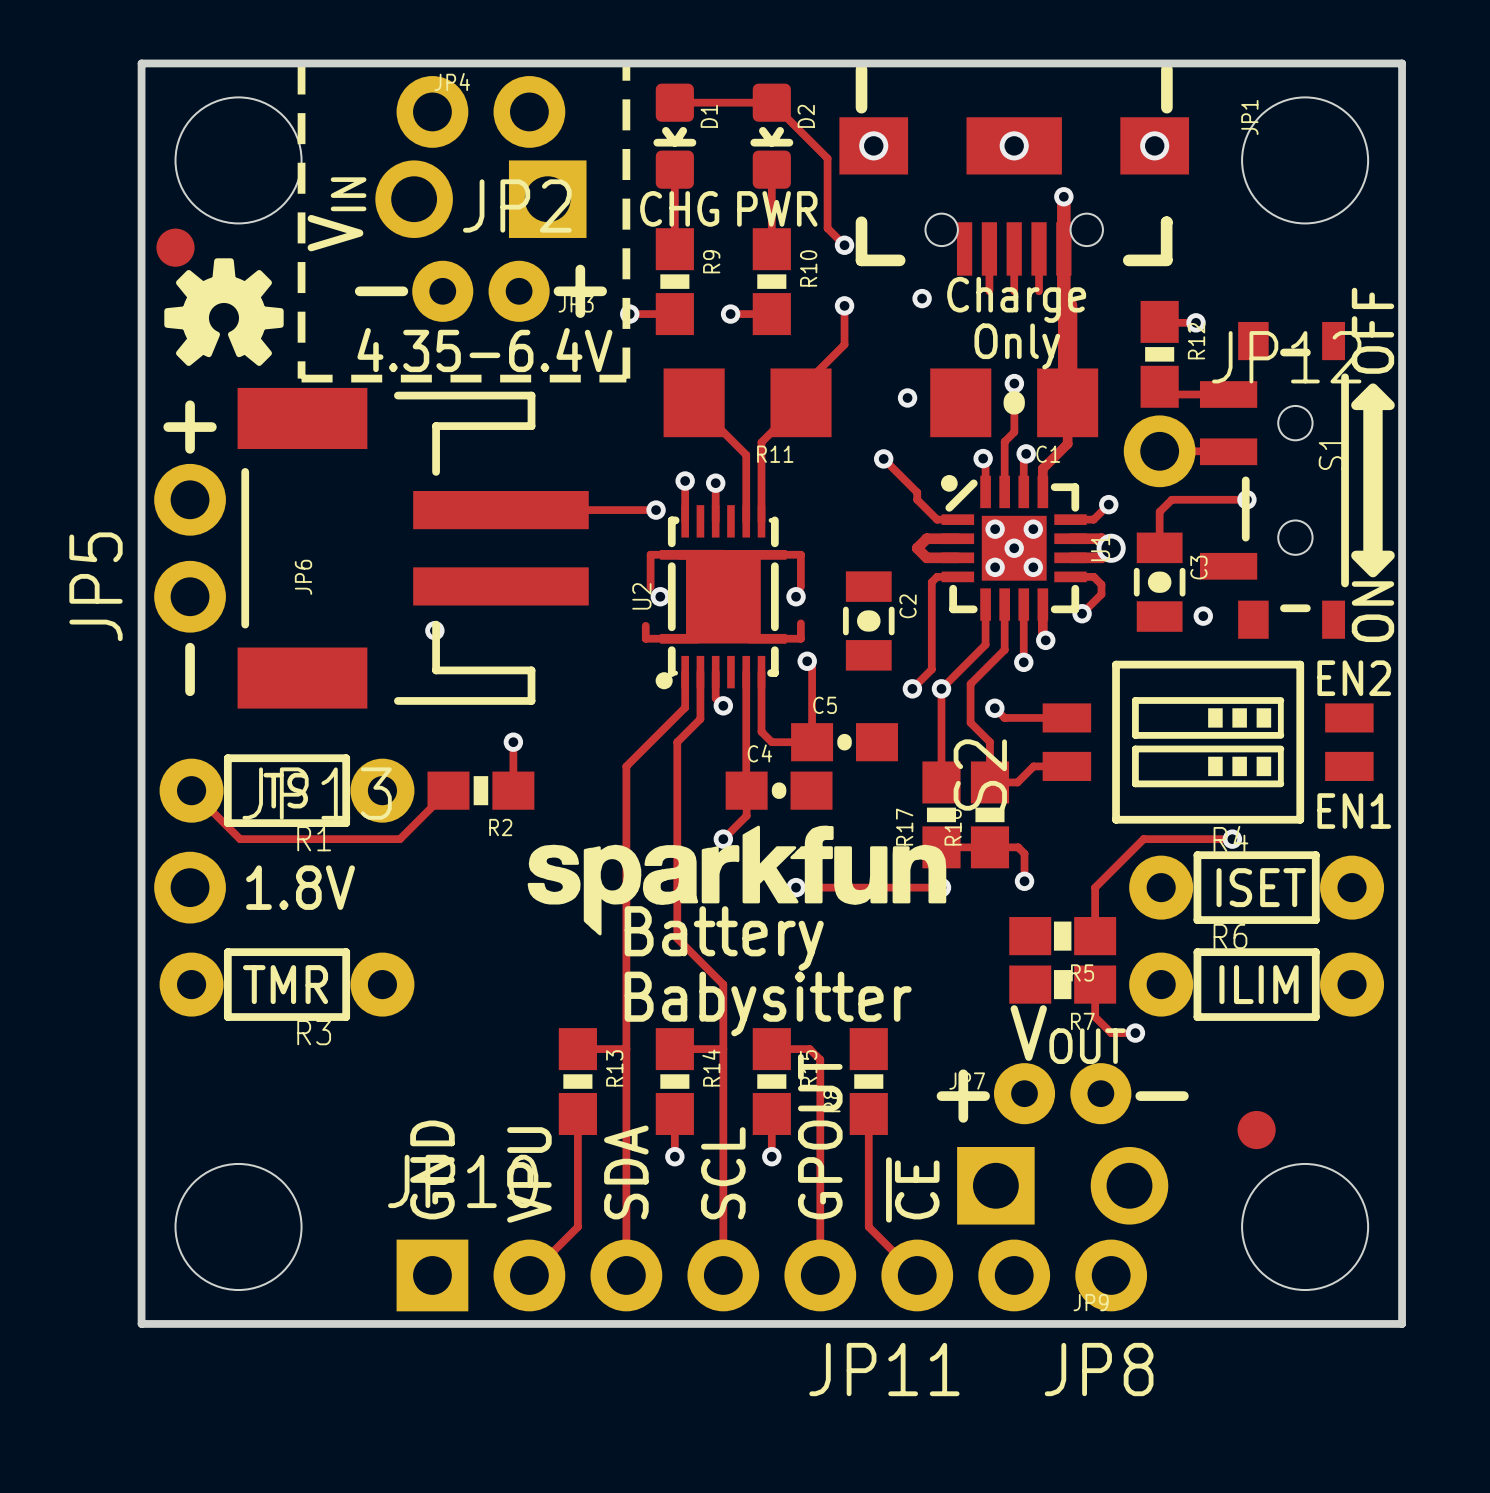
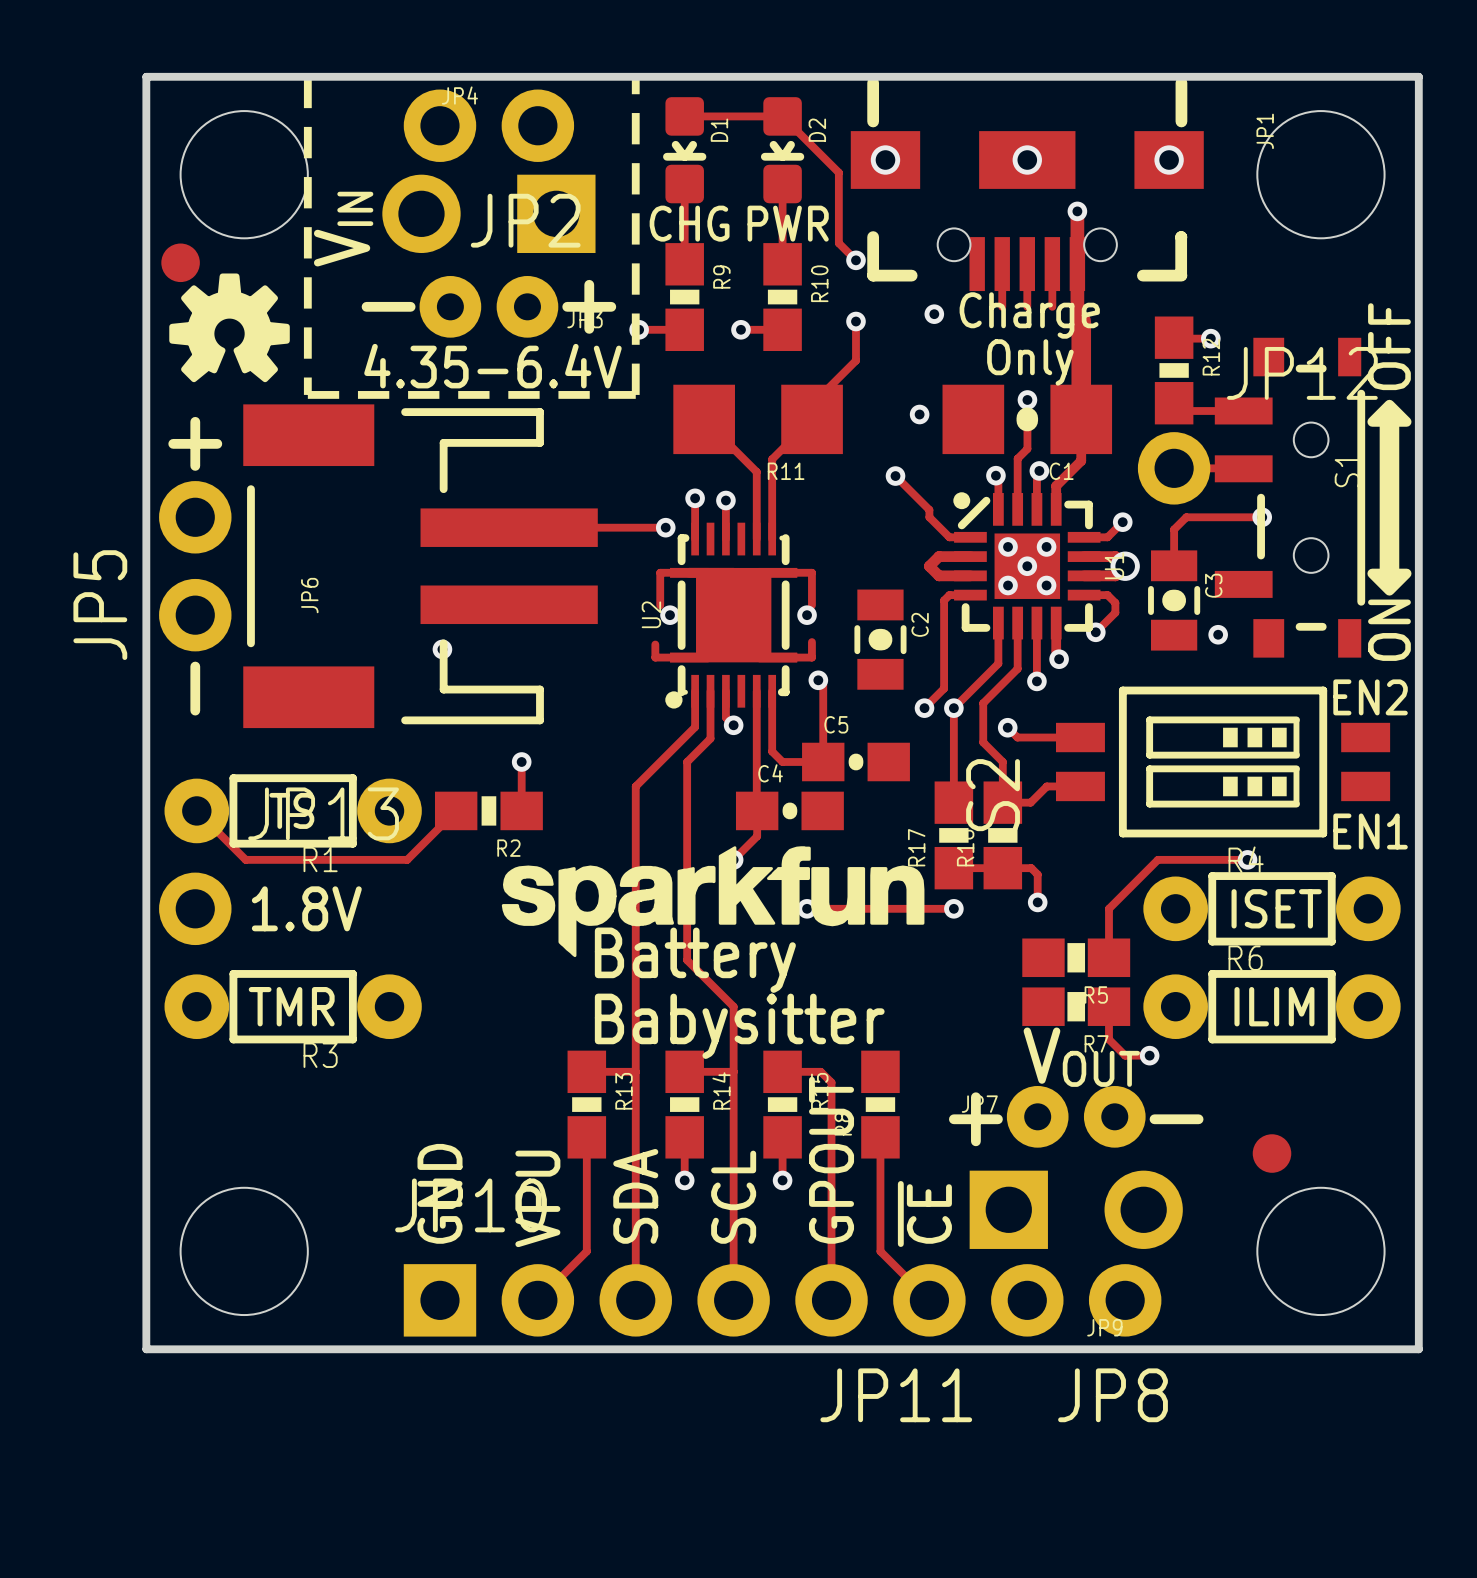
S2 footprint: [1042, 660, 1374, 824] -> [1056, 686, 1391, 838]
drawing position: (736, 880) -> (713, 901)
text position: Battery (724, 938) -> Battery (695, 960)
text position: Babysitter (768, 1003) -> Babysitter (739, 1026)

